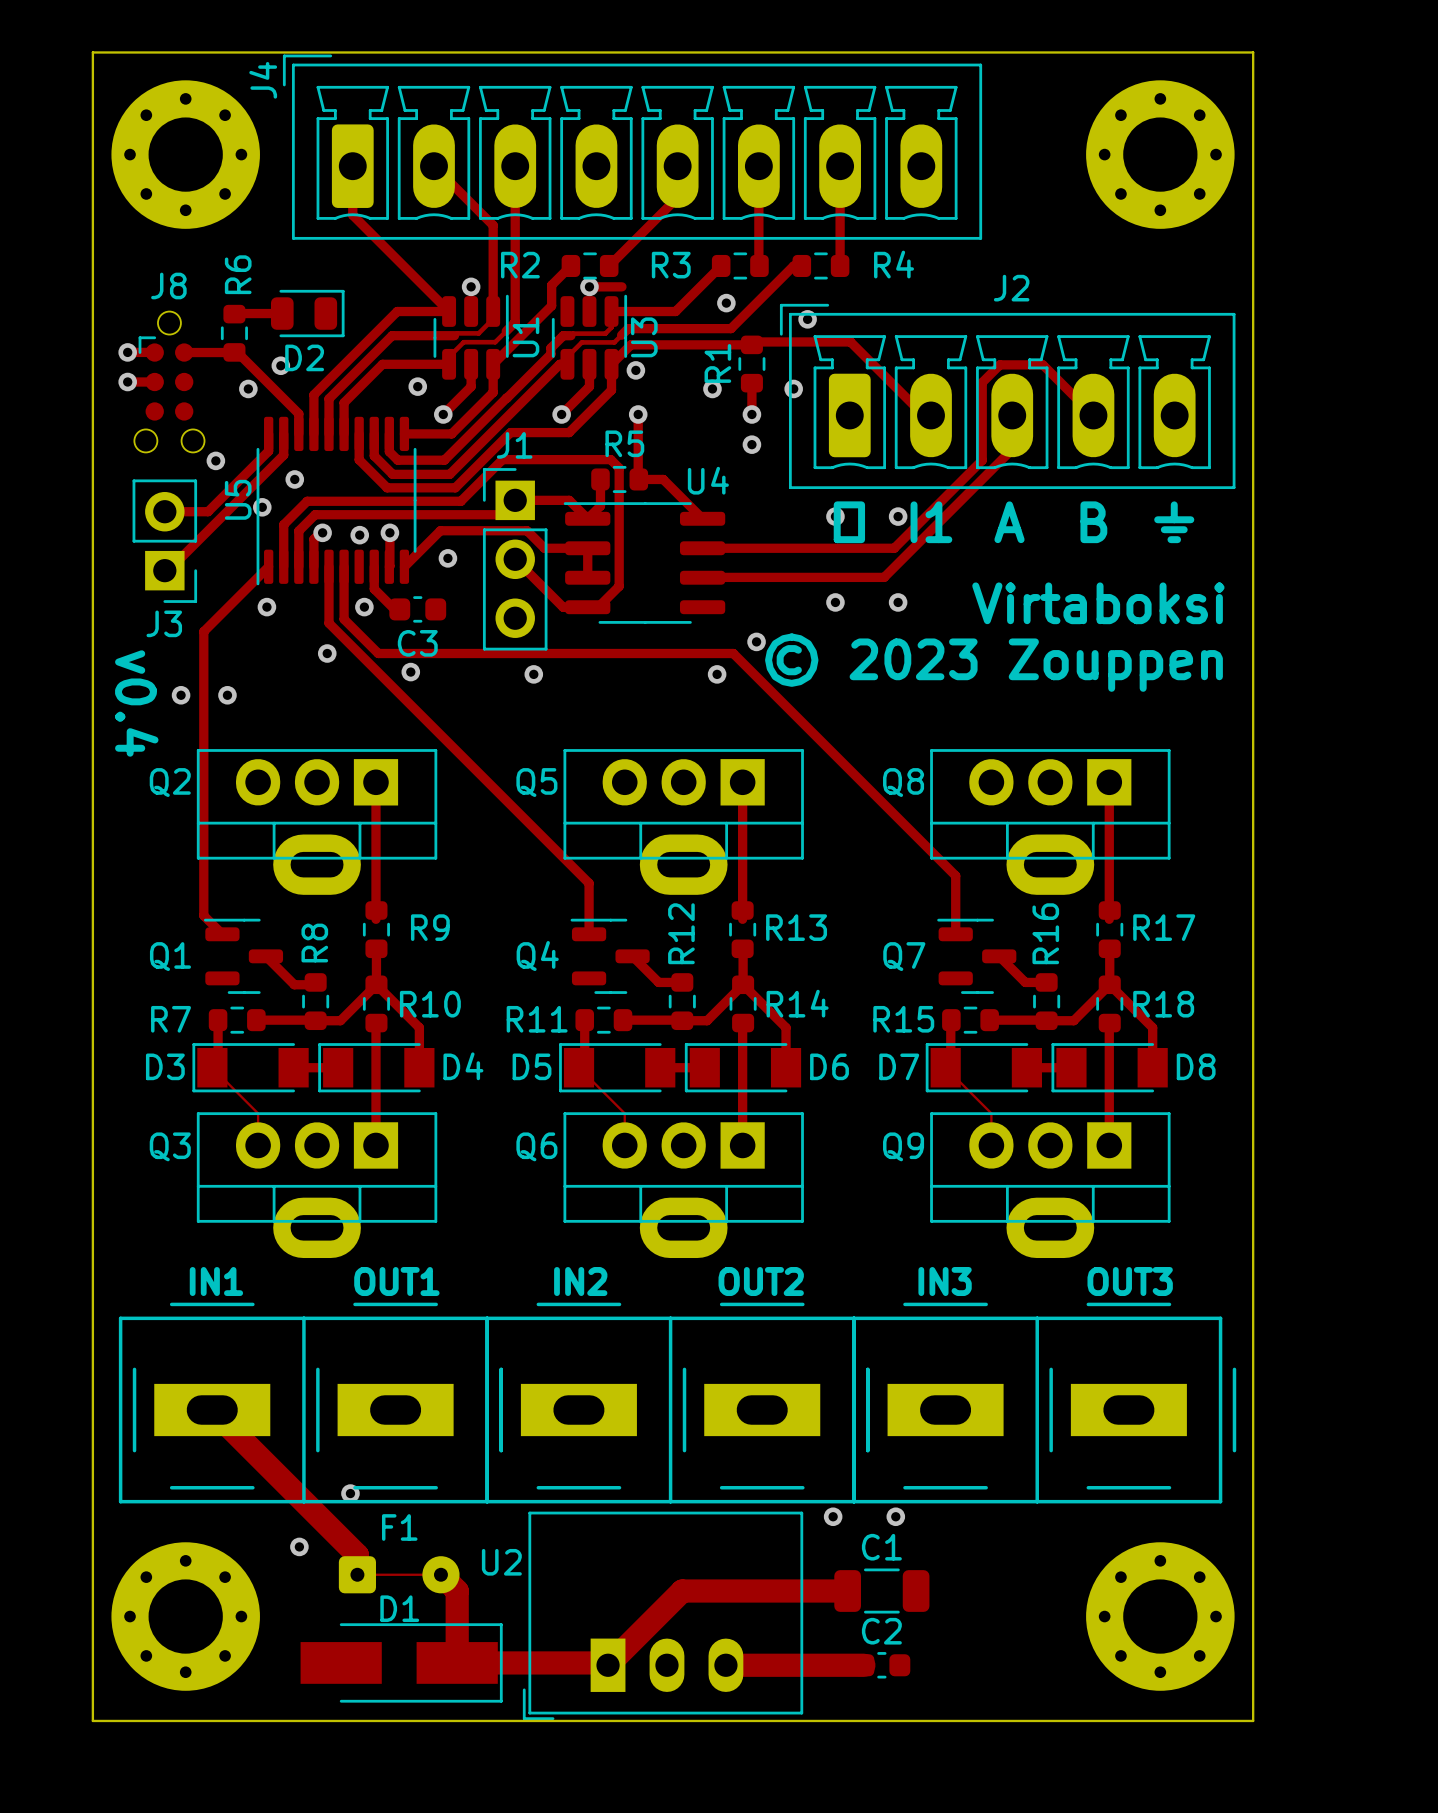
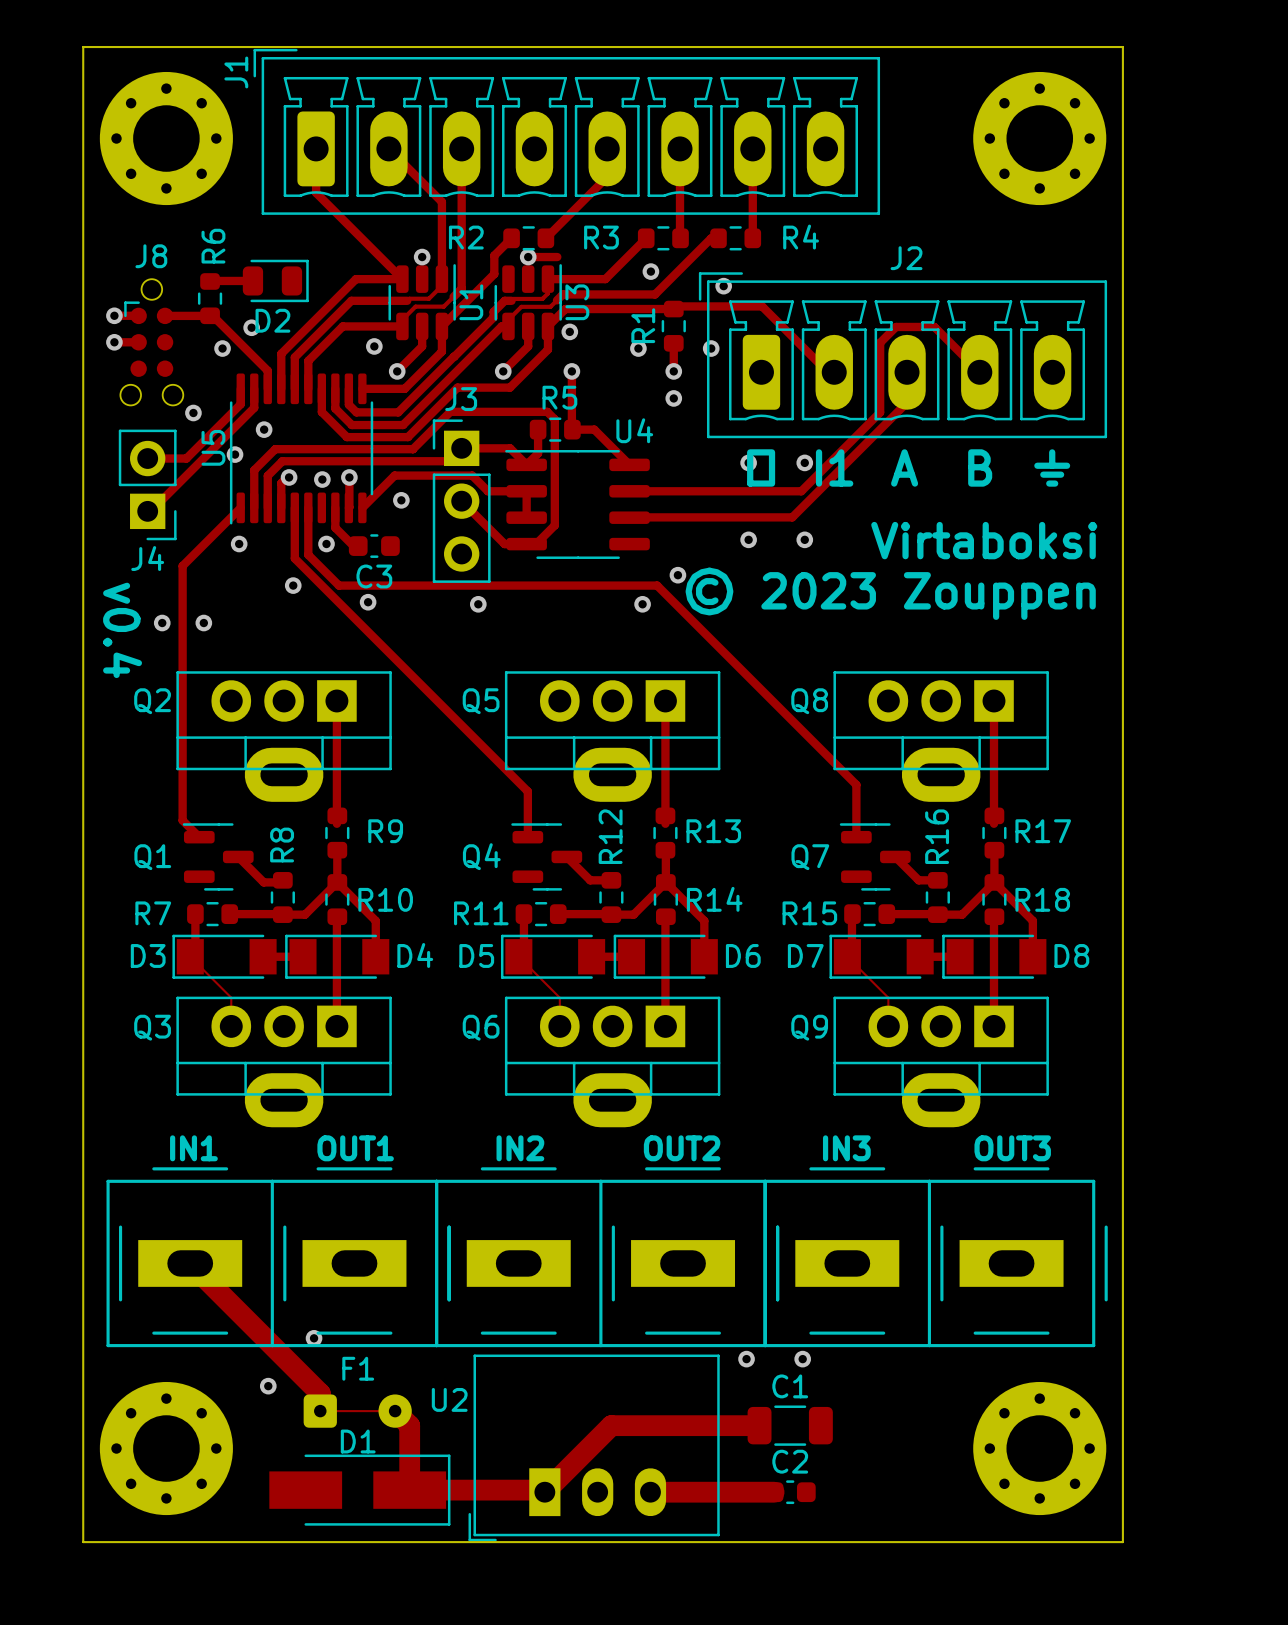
J4 name: J4 (263, 80) -> J1 (236, 72)
J1 name: J1 (514, 445) -> J3 (461, 399)
J3 name: J3 (164, 623) -> J4 (147, 558)

